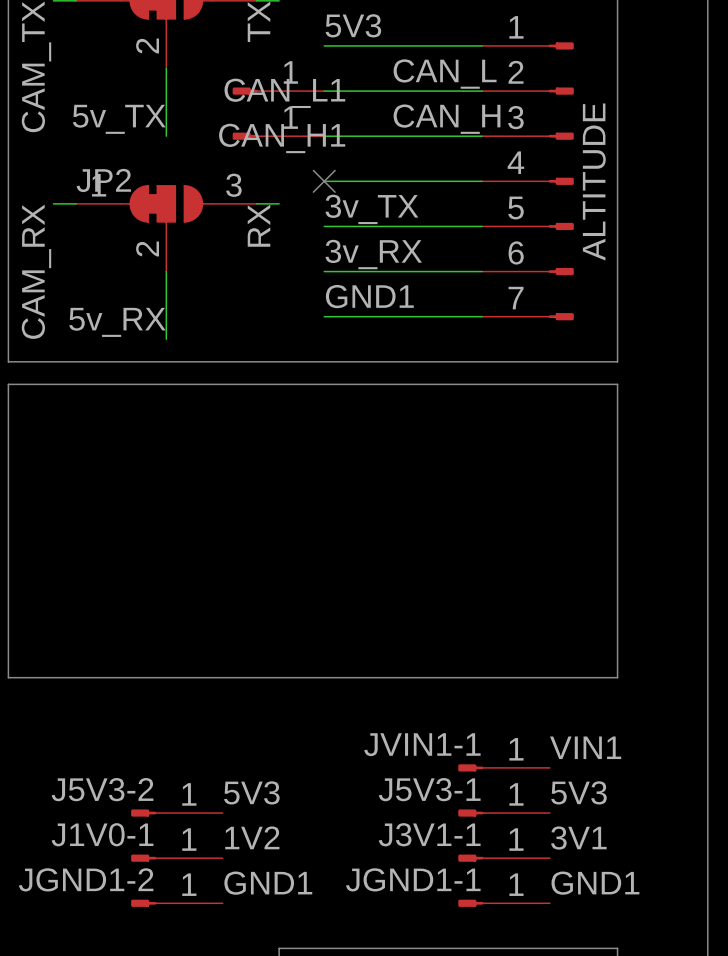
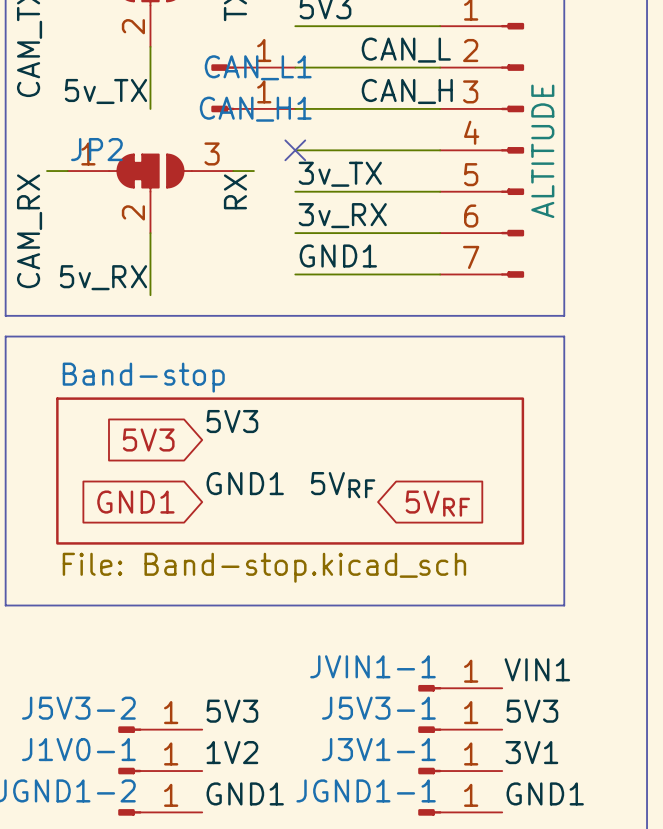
label: none -> 5V3 (232, 421)
global label: none -> 5V3 (148, 439)
sheet Band-stop: none -> File: Band-stop.kicad_sch (290, 471)
label: none -> GND1 (245, 483)
label: none -> 5VRF (343, 485)
global label: none -> GND1 (135, 502)
global label: none -> 5VRF (437, 503)

